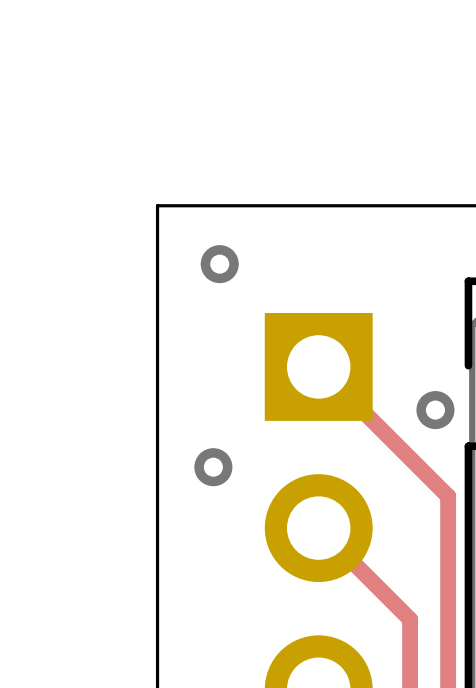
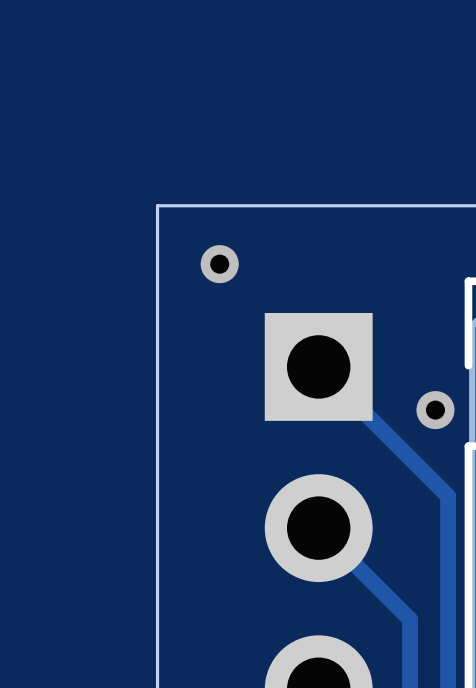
via: (213, 467) -> none

